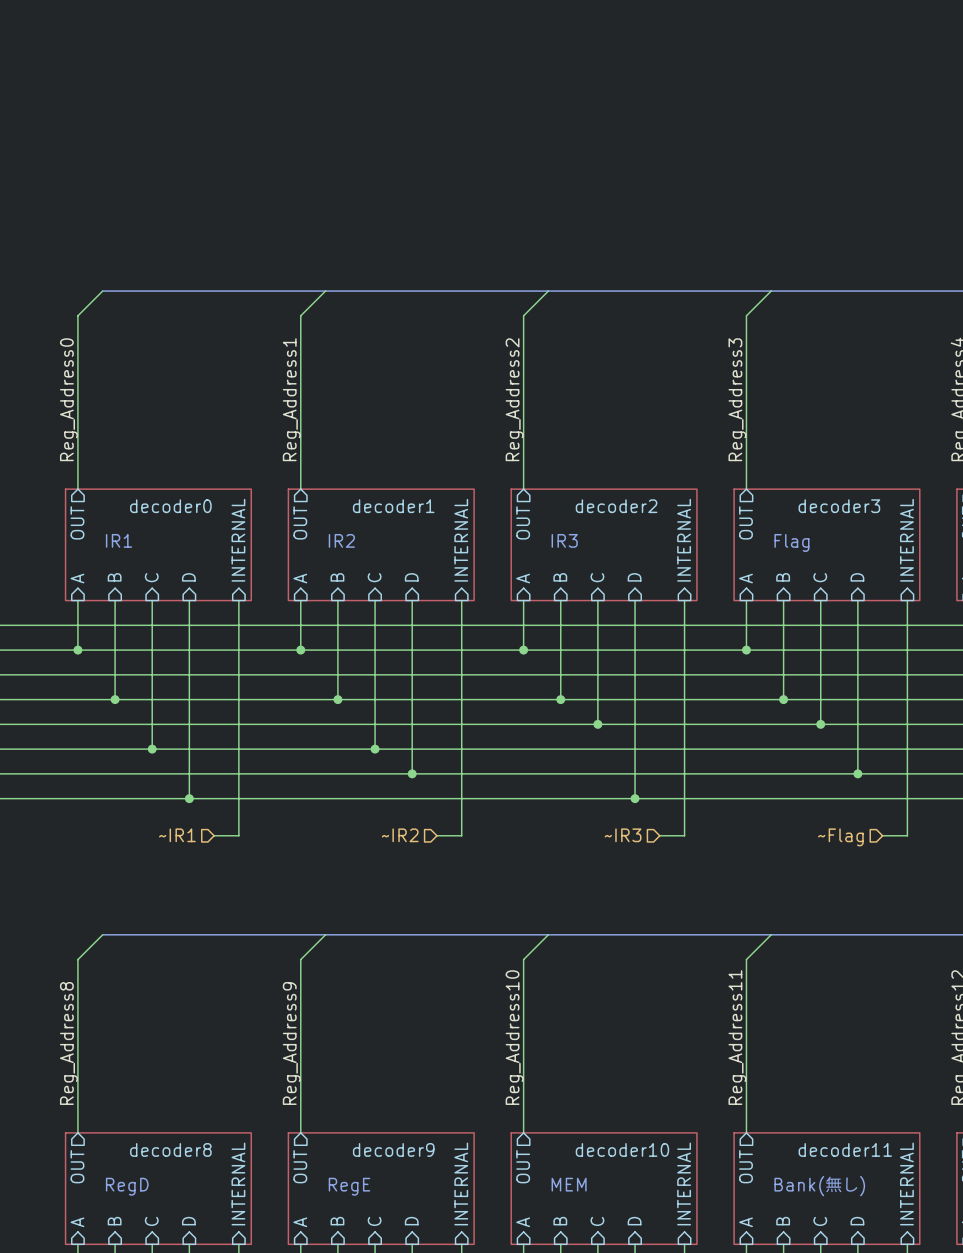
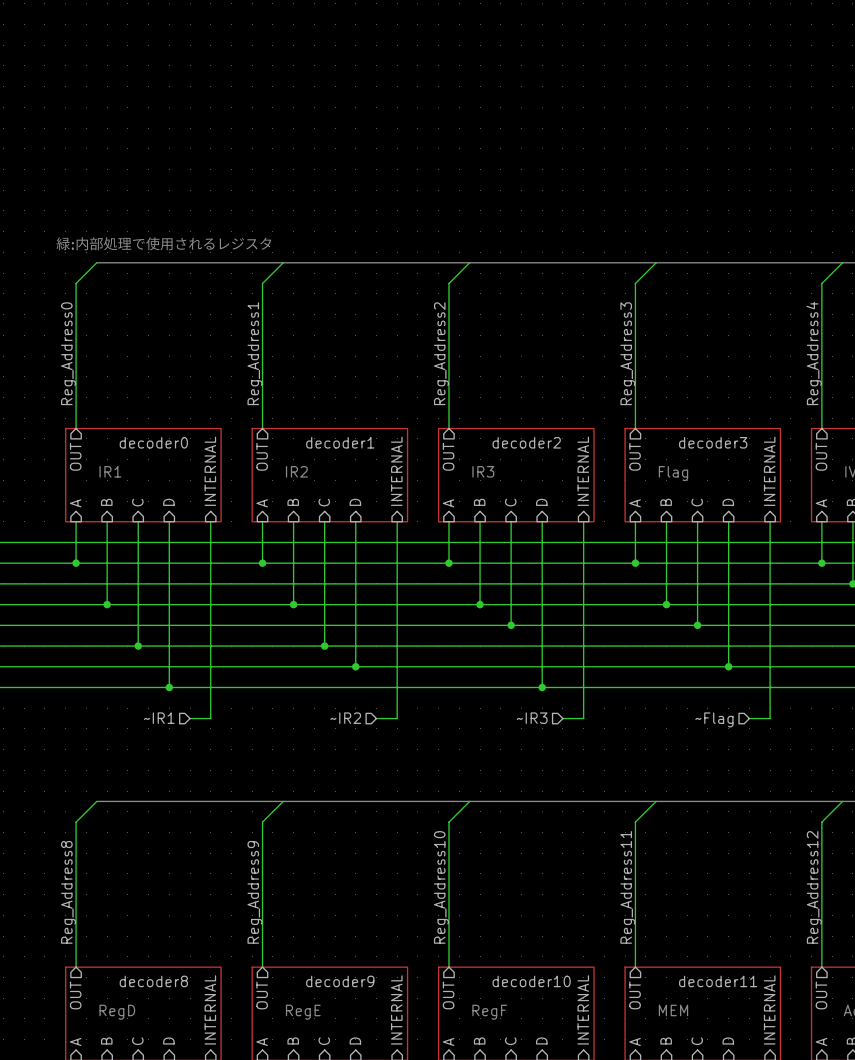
text: none -> 緑:内部処理で使用されるレジスタ (163, 243)
text: MEM (569, 1184) -> RegF (489, 1012)
text: Bank(無し) (819, 1186) -> MEM (673, 1010)

